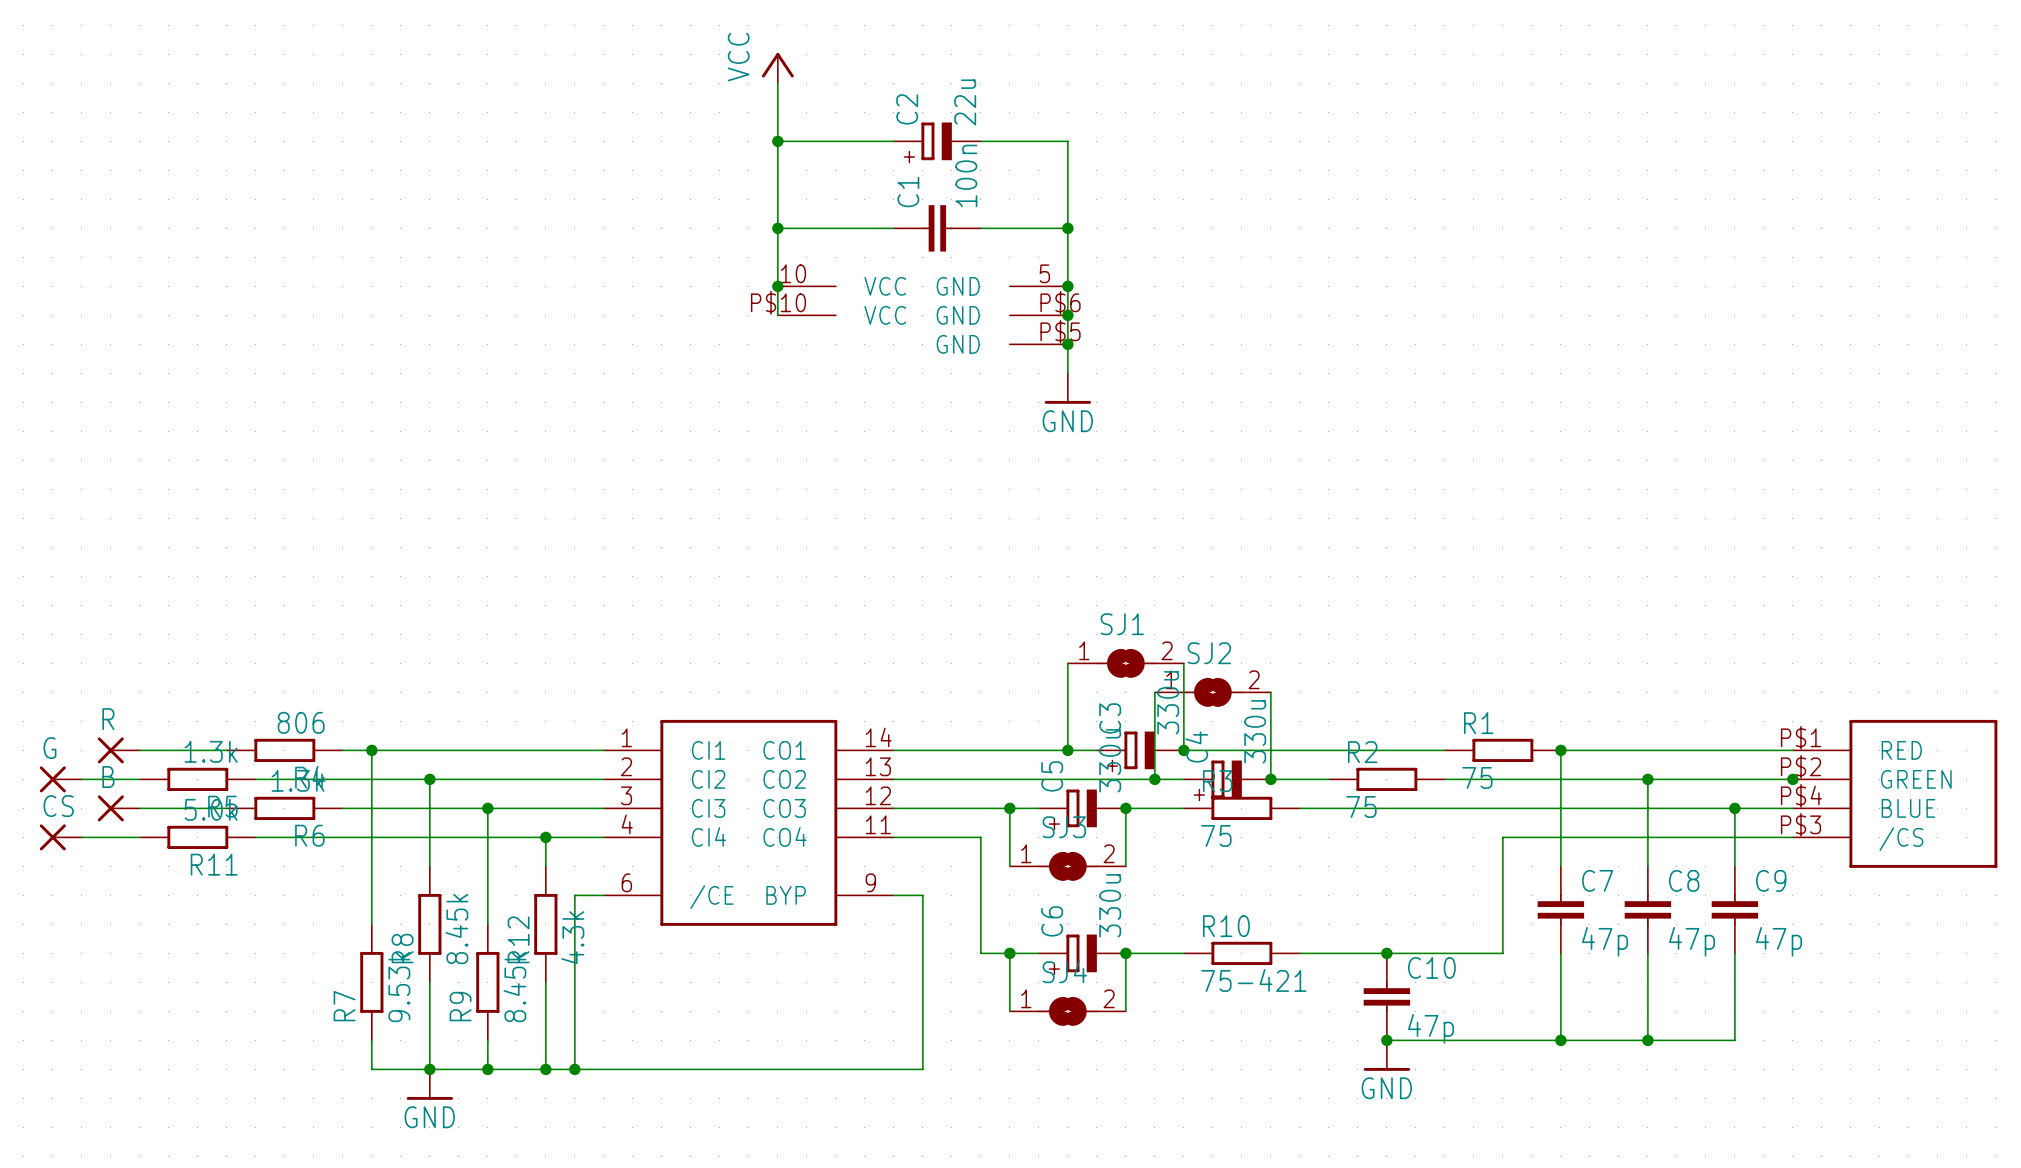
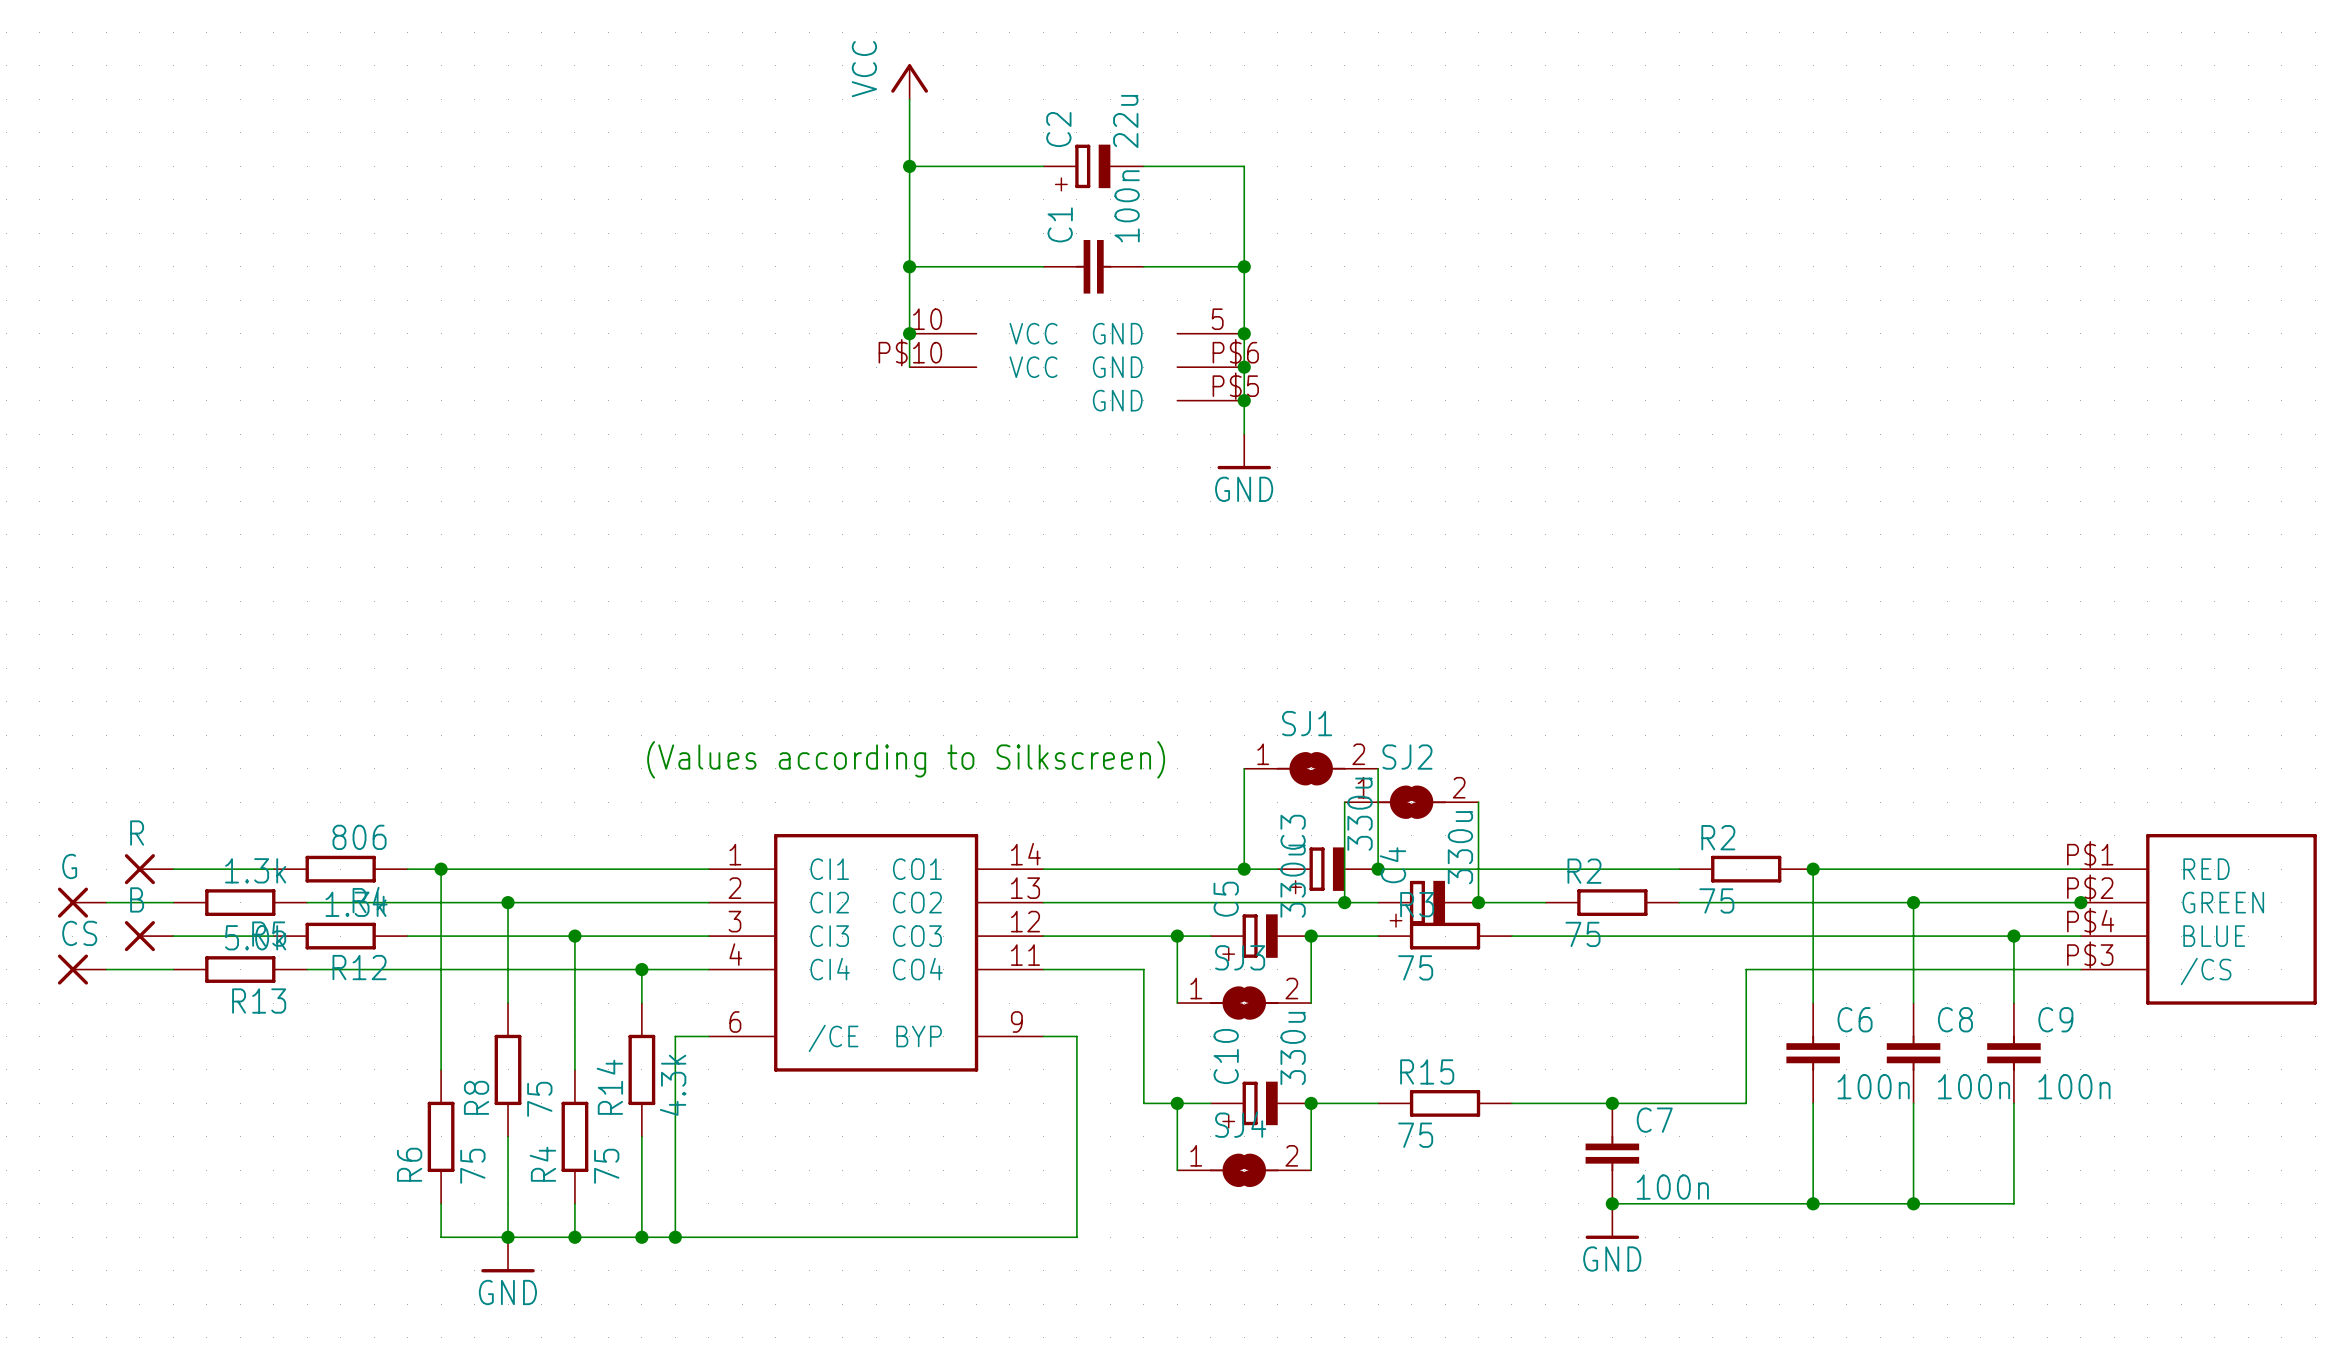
text: none -> (Values according to Silkscreen) (906, 759)
R1 name: R1 (1478, 723) -> R2 (1718, 837)
R6 name: R6 (309, 835) -> R12 (359, 967)
R11 name: R11 (214, 864) -> R13 (259, 1001)
C7 name: C7 (1597, 880) -> C6 (1855, 1019)
C6 name: C6 (1052, 921) -> C10 (1226, 1056)
R10 name: R10 (1226, 926) -> R15 (1427, 1071)
R8 value: 8.45k (456, 928) -> 75 (539, 1099)
R12 name: R12 (518, 939) -> R14 (609, 1087)
C7 value: 47p (1605, 941) -> 100n (1873, 1086)
C8 value: 47p (1692, 941) -> 100n (1974, 1086)
C9 value: 47p (1779, 941) -> 100n (2074, 1086)
C10 name: C10 (1431, 967) -> C7 (1654, 1120)
R10 value: 75-421 (1253, 980) -> 75 (1415, 1135)
R7 value: 9.53k (399, 986) -> 75 (472, 1166)
R9 value: 8.45k (514, 986) -> 75 (606, 1166)
R7 name: R7 (344, 1006) -> R6 (409, 1164)
R9 name: R9 (460, 1006) -> R4 (542, 1164)
C10 value: 47p (1431, 1028) -> 100n (1672, 1187)

